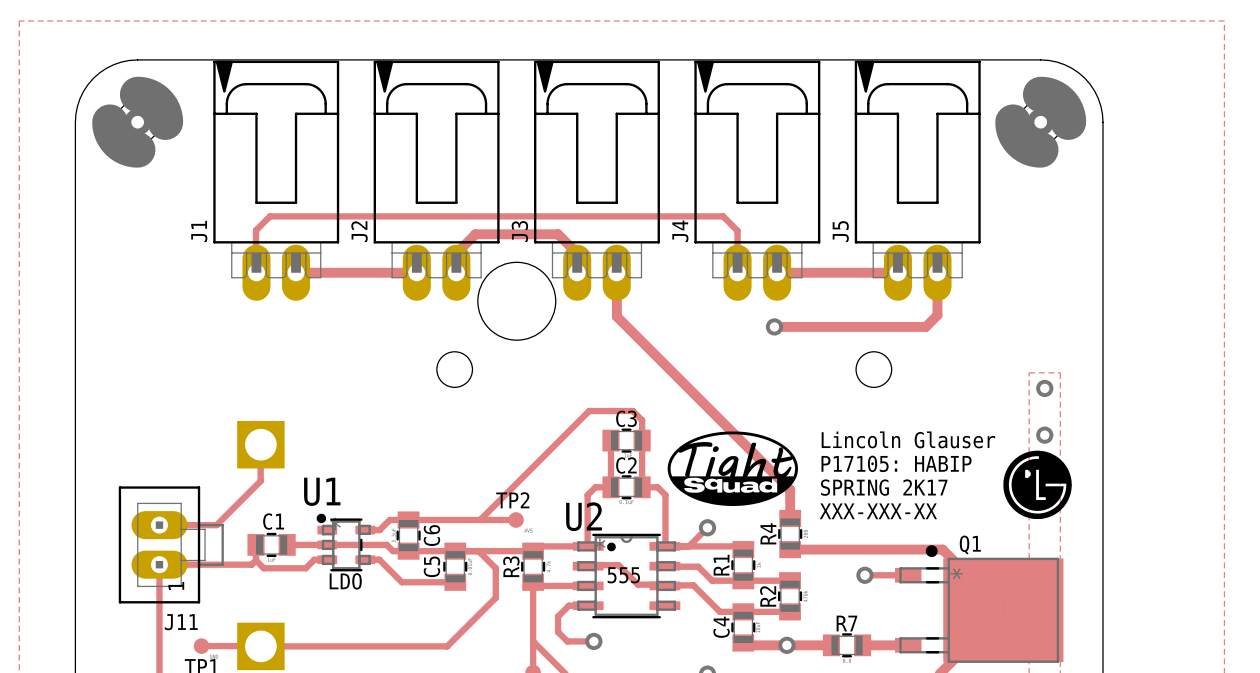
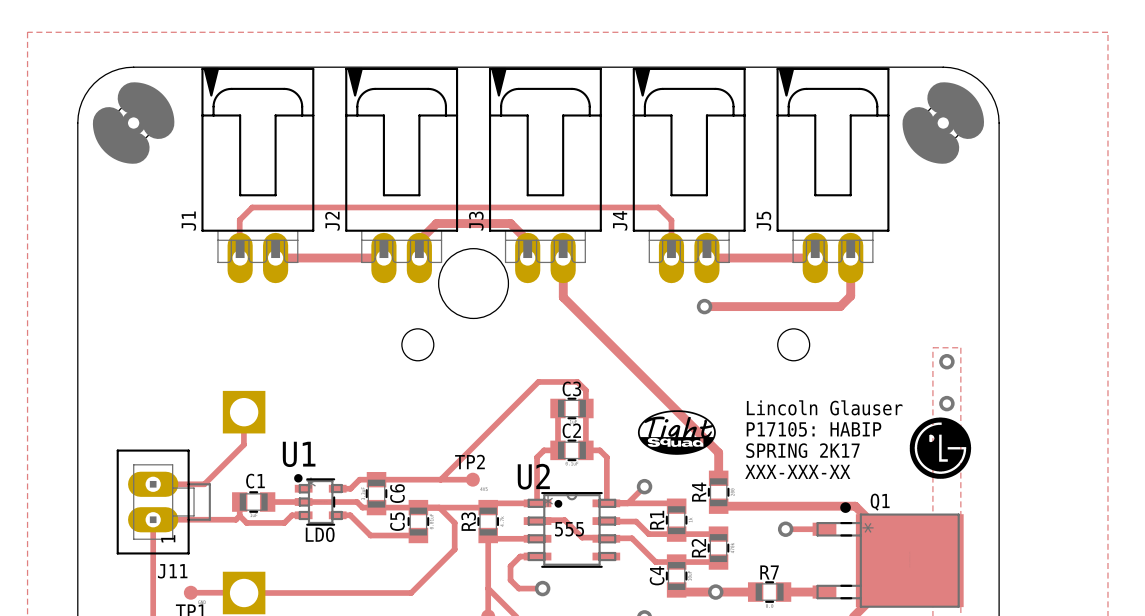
drawing shape: [667, 431, 799, 507] -> [637, 410, 716, 455]

